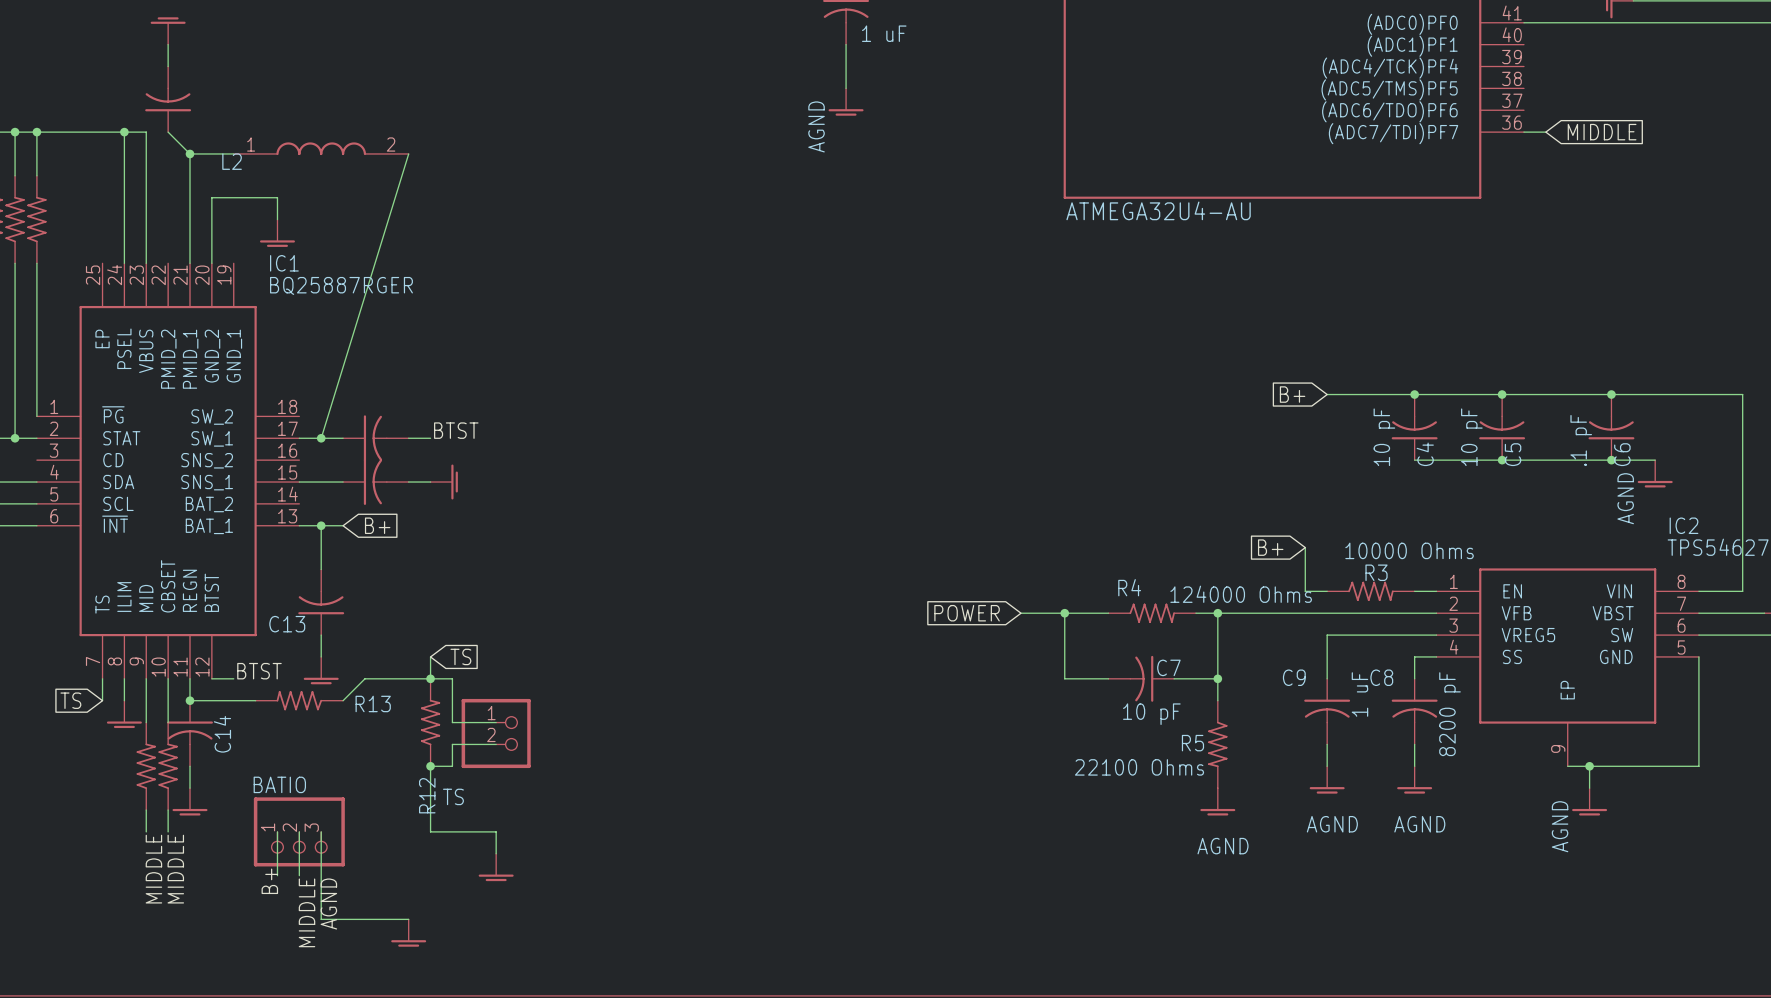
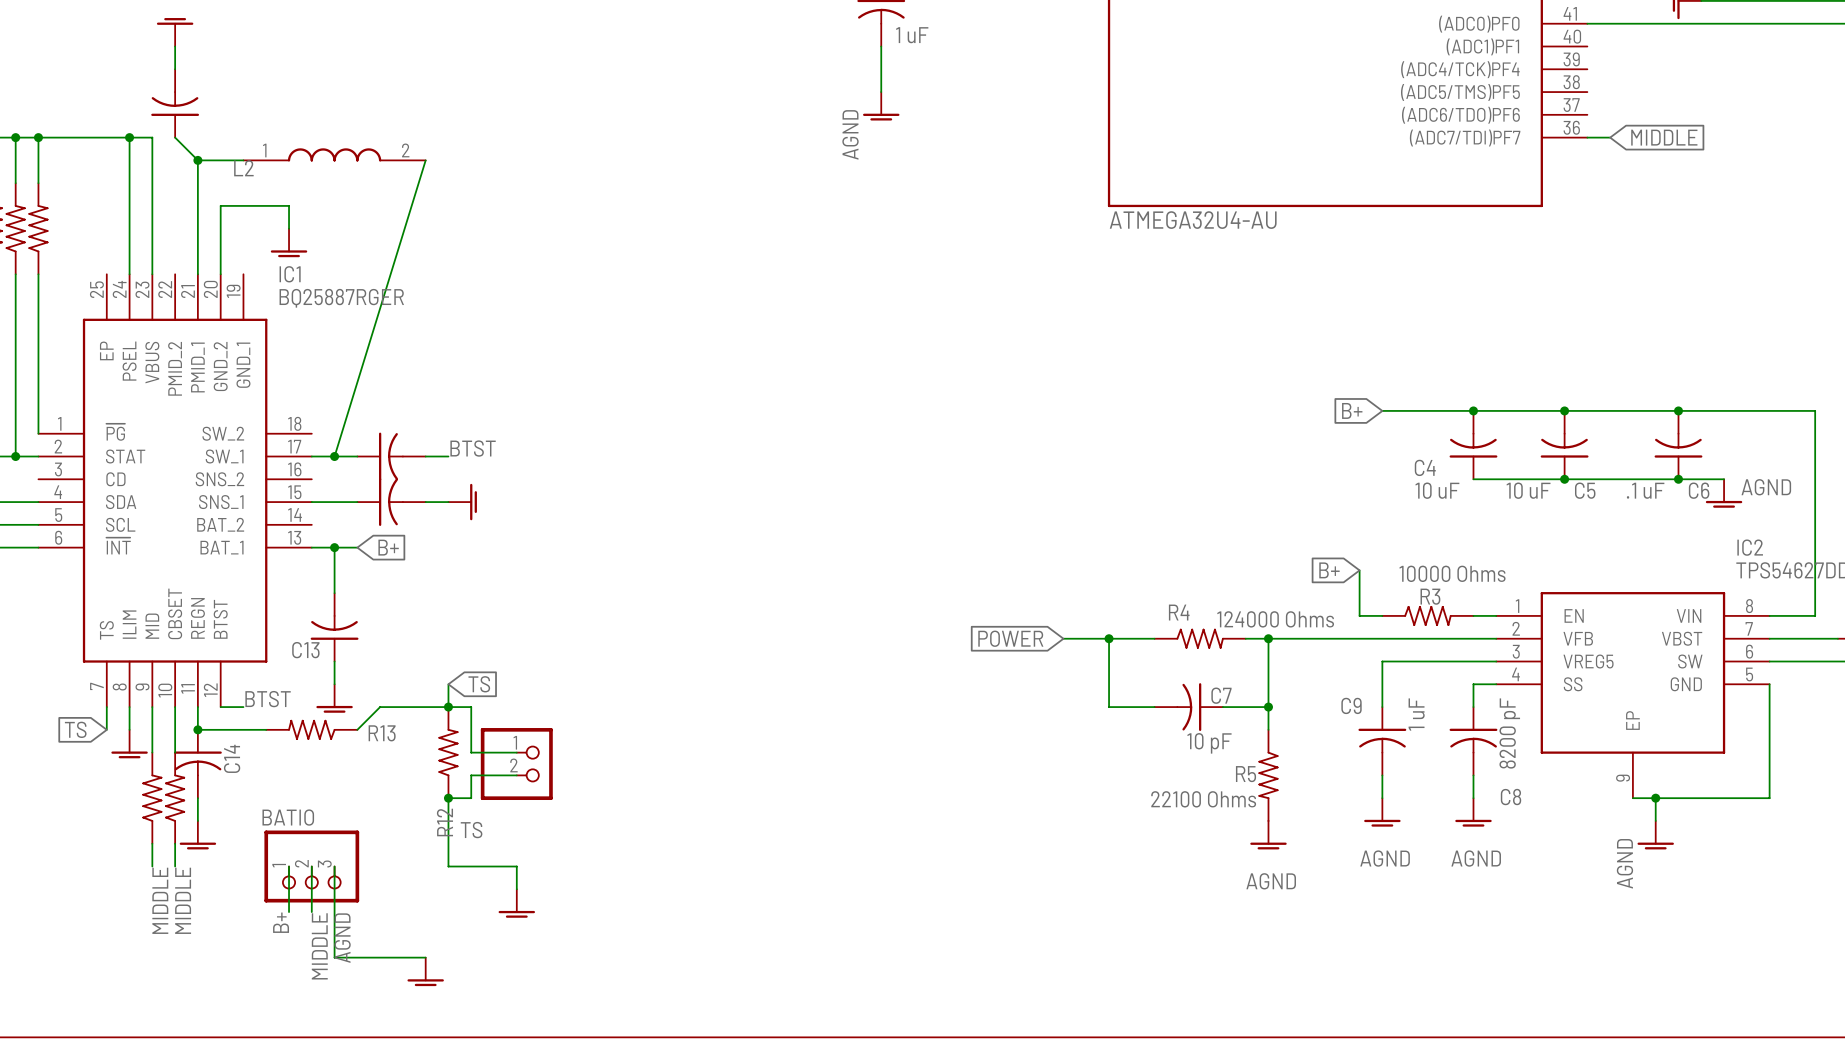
C4 value: 10 pF (1384, 437) -> 10 uF (1437, 490)
C5 value: 10 pF (1471, 437) -> 10 uF (1528, 490)
C6 value: .1 pF (1581, 440) -> .1 uF (1645, 490)
C4 name rotation: 0° (1425, 454) -> 90° clockwise (1425, 467)
C4 name position: C4 (1425, 454) -> C4 (1425, 467)
C5 name rotation: 0° (1513, 454) -> 90° clockwise (1585, 490)
C6 name rotation: 0° (1622, 454) -> 90° clockwise (1699, 490)
power symbol text rotation: 0° (1625, 498) -> 90° clockwise (1766, 487)
C8 name position: C8 (1381, 677) -> C8 (1511, 797)

